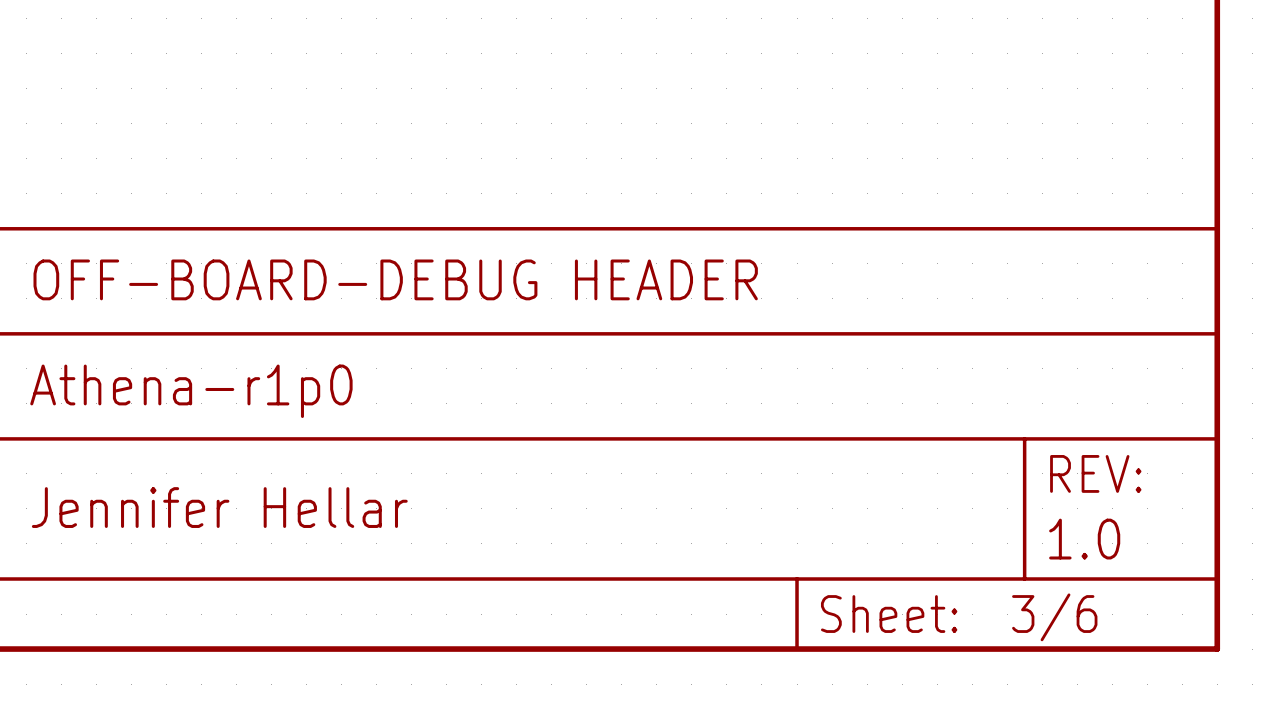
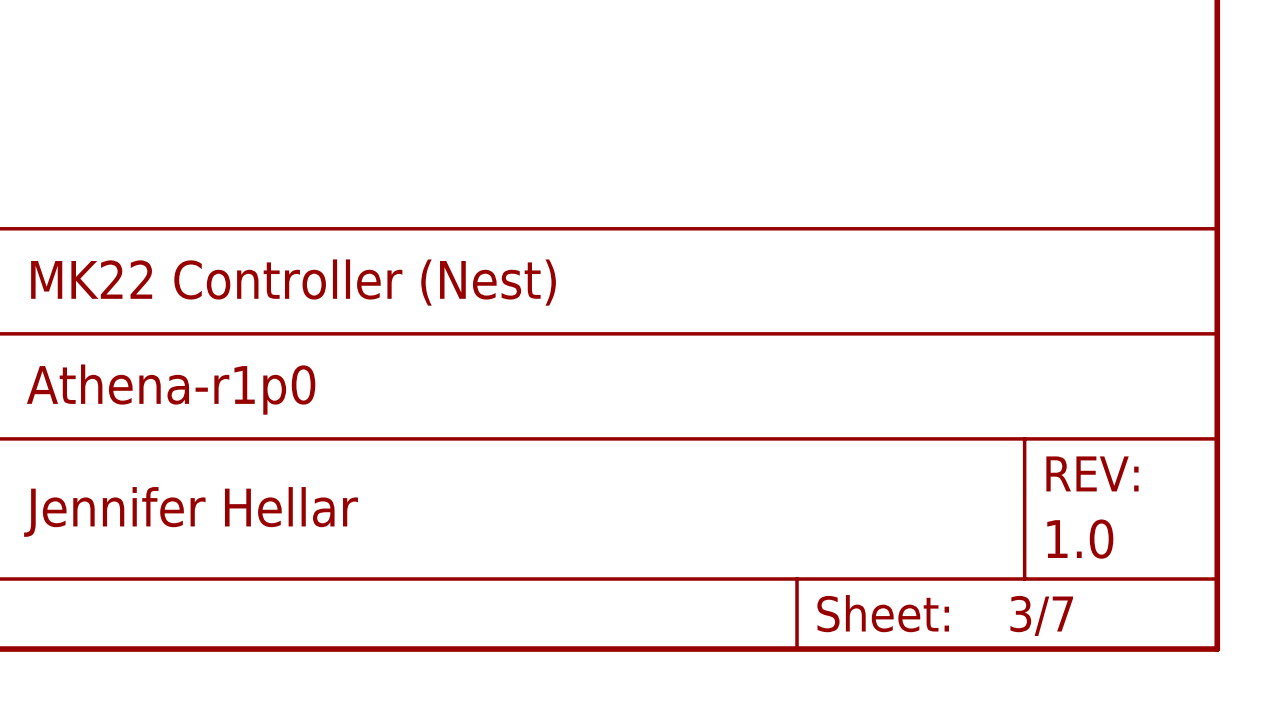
part text: OFF-BOARD-DEBUG HEADER (395, 279) -> MK22 Controller (Nest) (293, 282)
part text: 3/6 (1054, 617) -> 3/7 (1041, 615)

